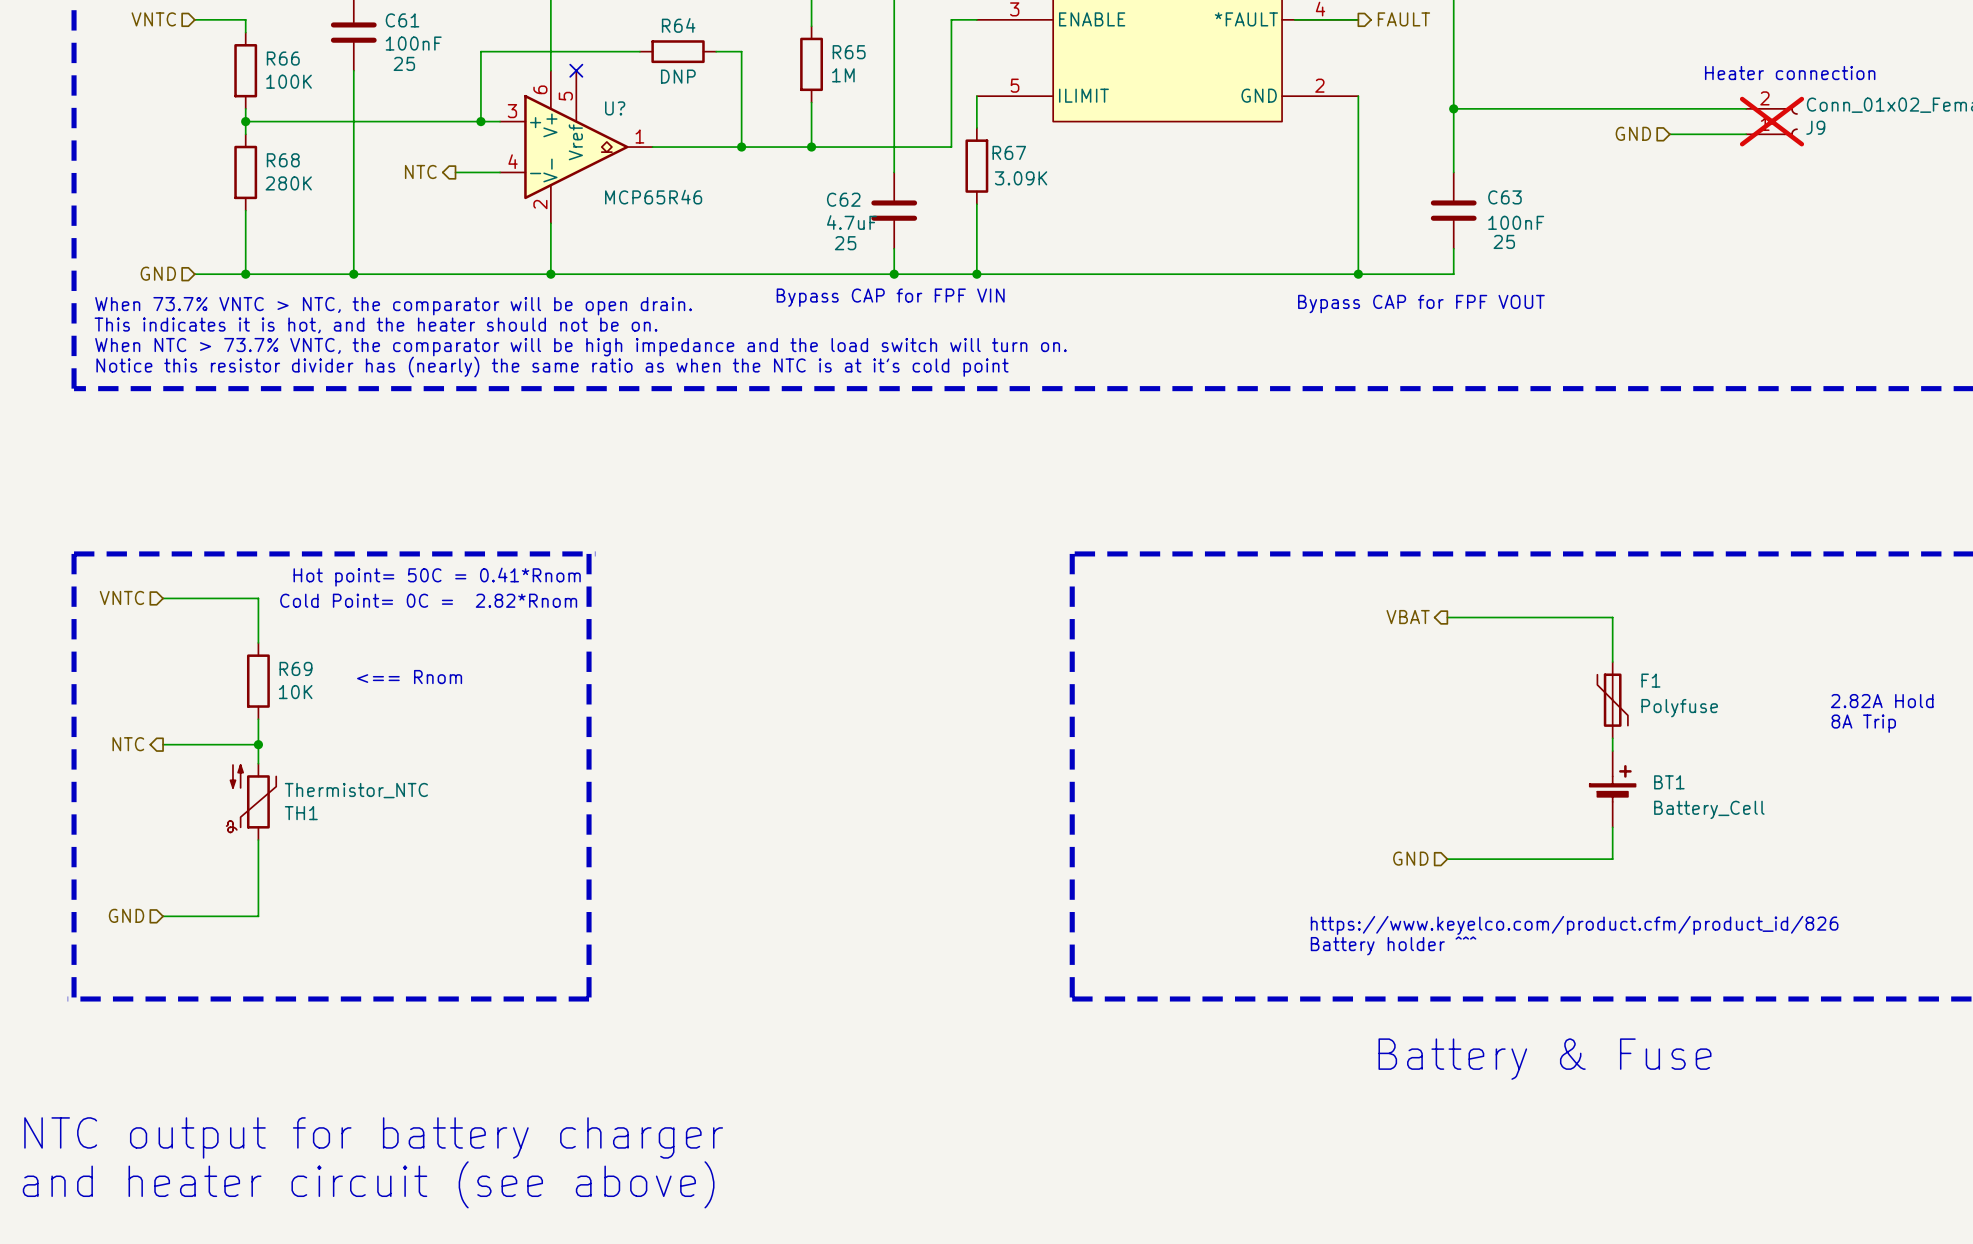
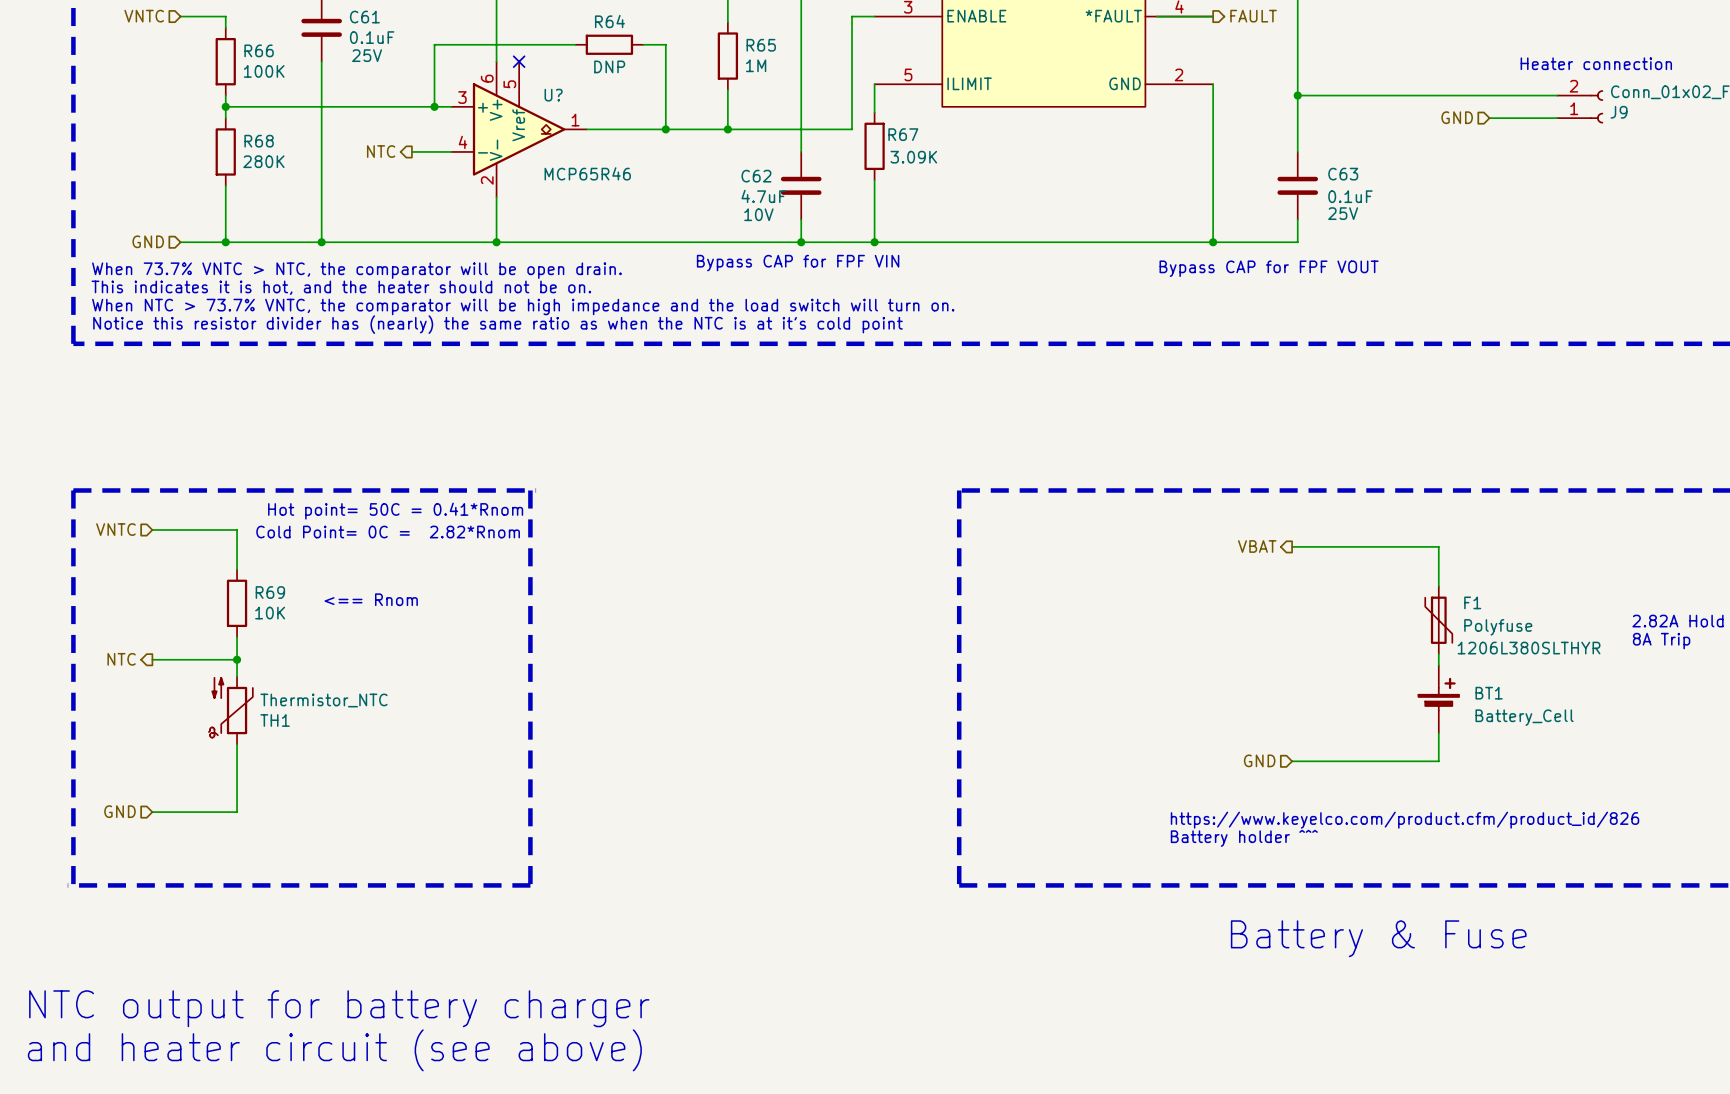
C61 value: 100nF (413, 43) -> 0.1uF (372, 37)
C61 text: 25 (404, 63) -> 25V (367, 55)
J9 do-not-place cross: (1771, 121) -> none
C63 value: 100nF (1516, 222) -> 0.1uF (1350, 196)
C63 text: 25 (1504, 241) -> 25V (1343, 213)
C62 text: 25 (845, 243) -> 10V (758, 214)
F1 text: none -> 1206L380SLTHYR (1529, 648)

